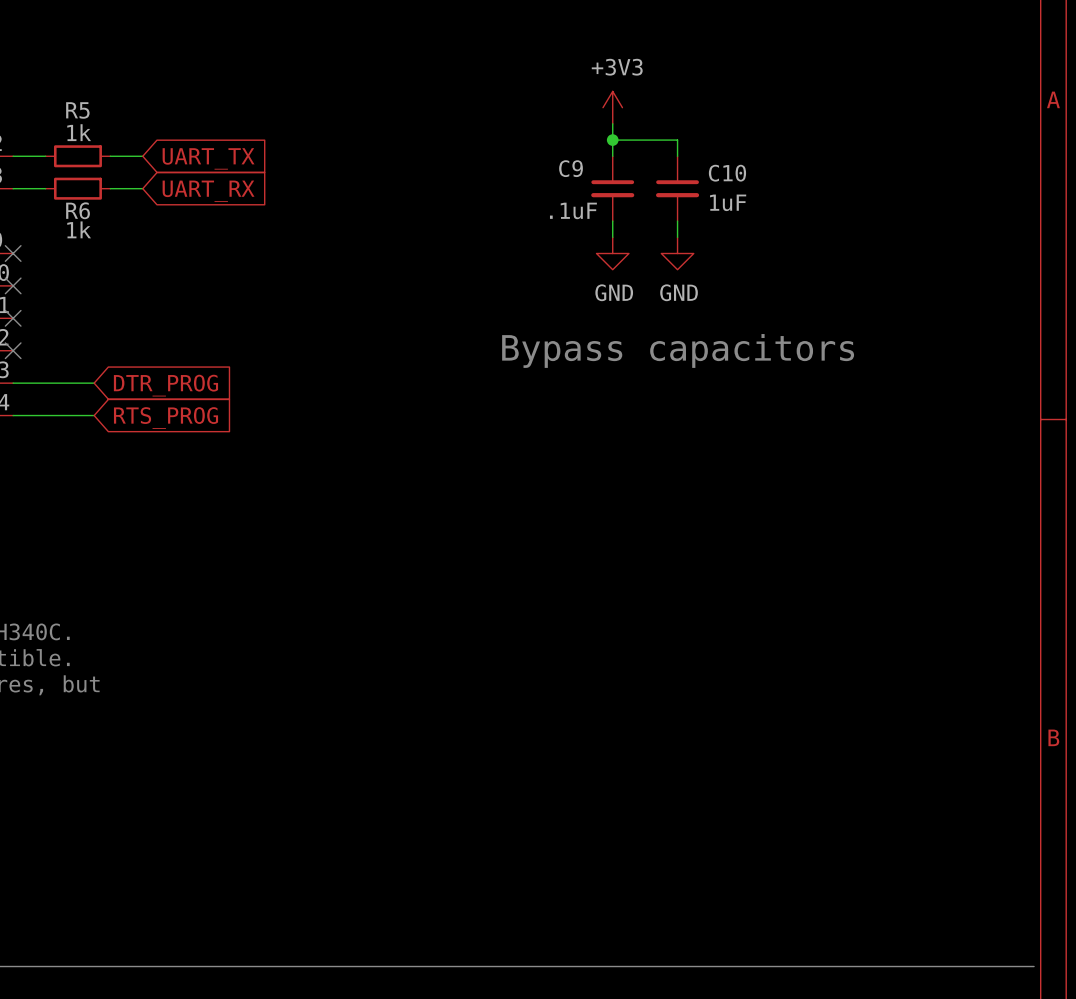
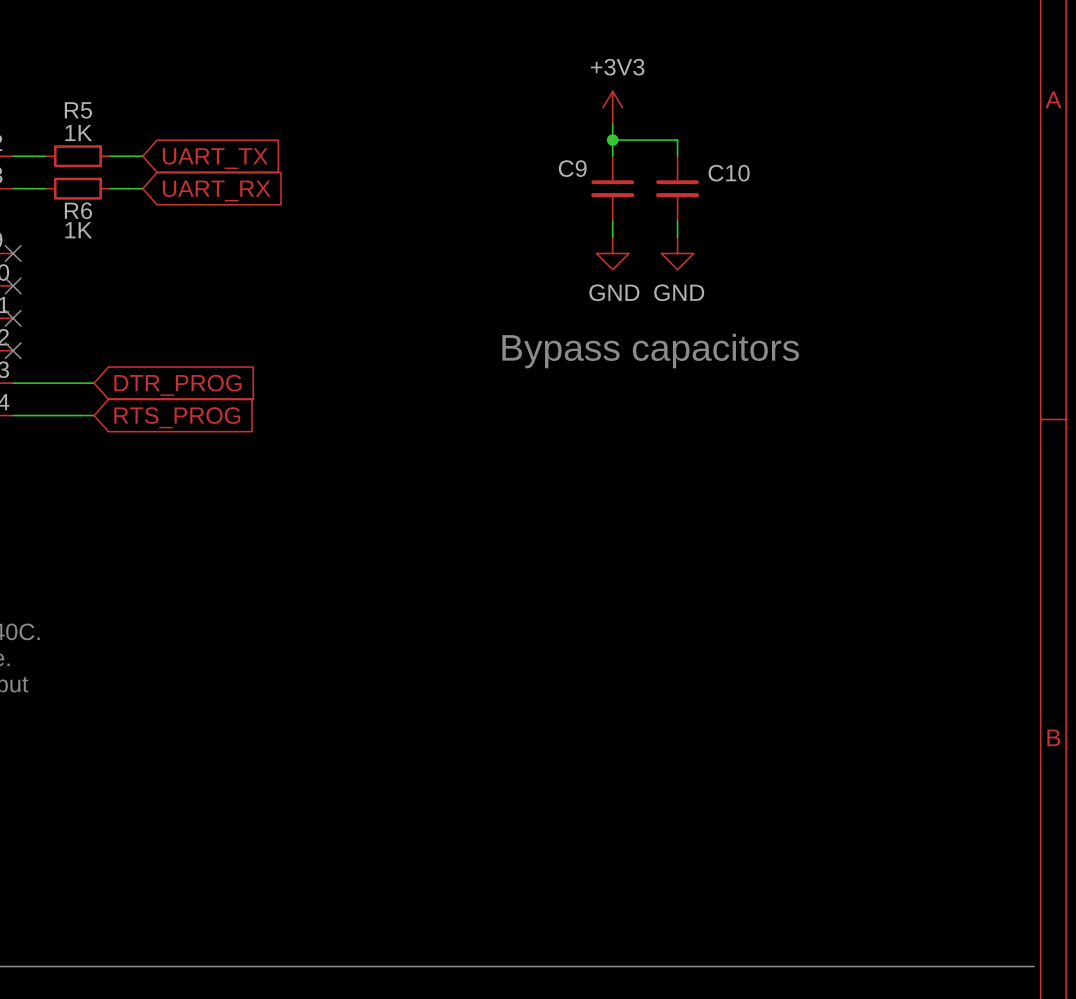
R5 value: 1k (79, 132) -> 1K (78, 132)
C10 value: 1uF (728, 202) -> none
C9 value: .1uF (573, 210) -> none
R6 value: 1k (79, 229) -> 1K (78, 230)

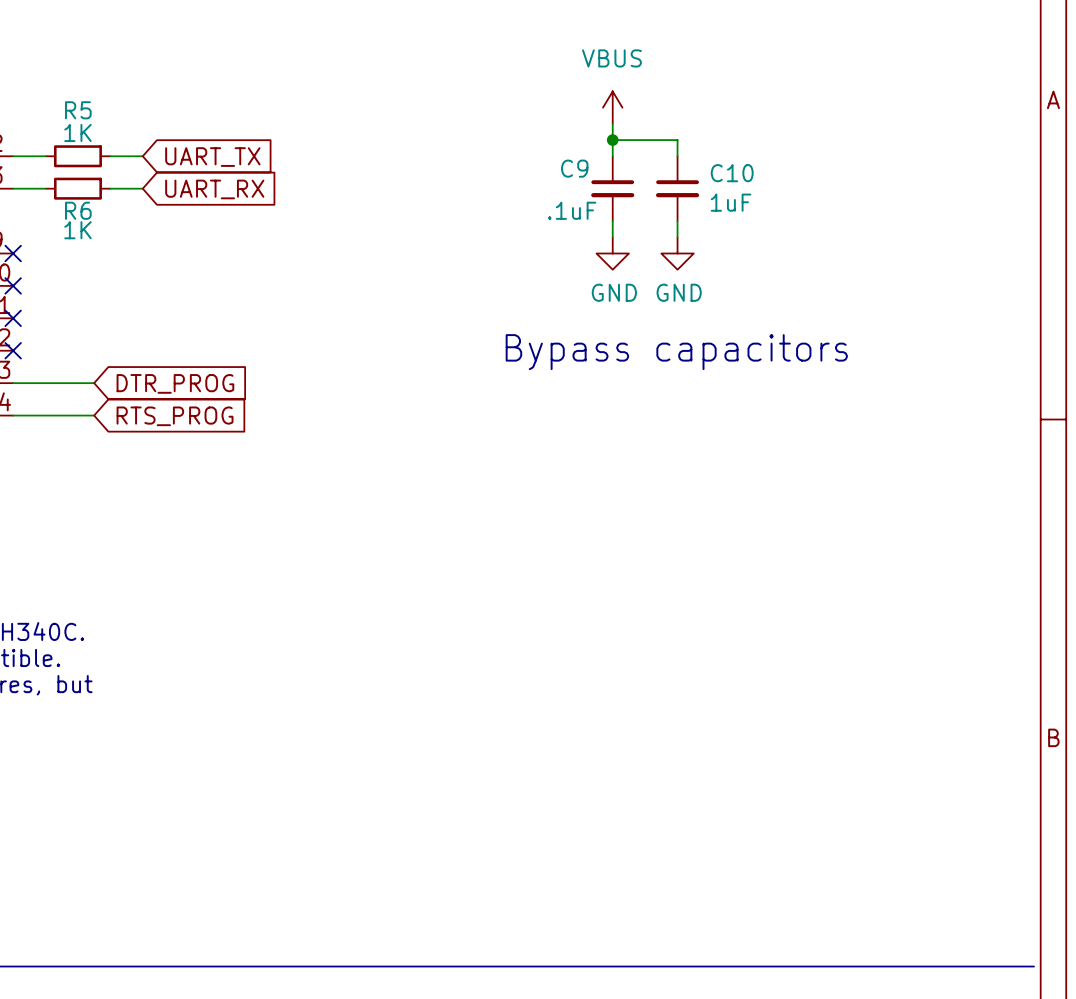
power symbol: +3V3 (612, 107) -> VBUS (612, 107)
C10 value: none -> 1uF (731, 202)
C9 value: none -> .1uF (572, 210)

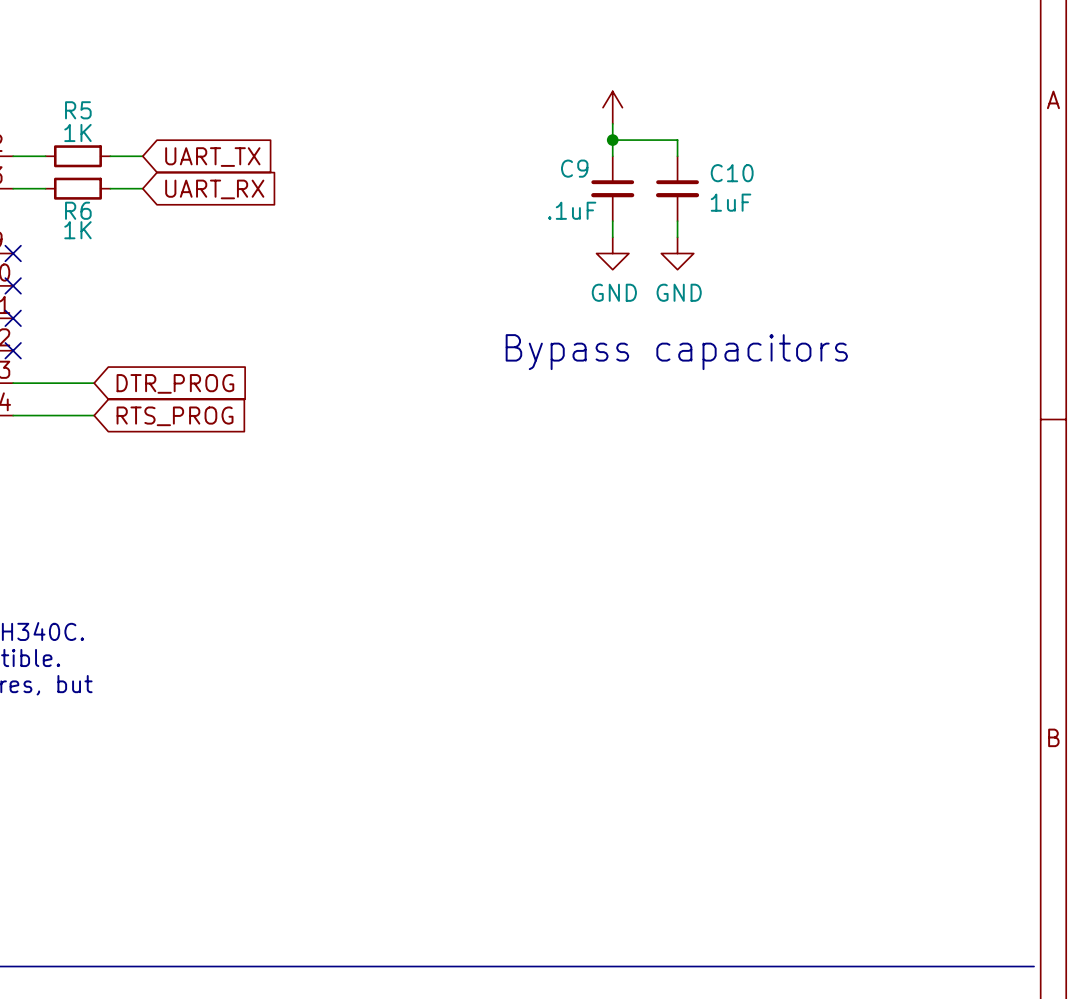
power symbol text: VBUS (611, 58) -> none

